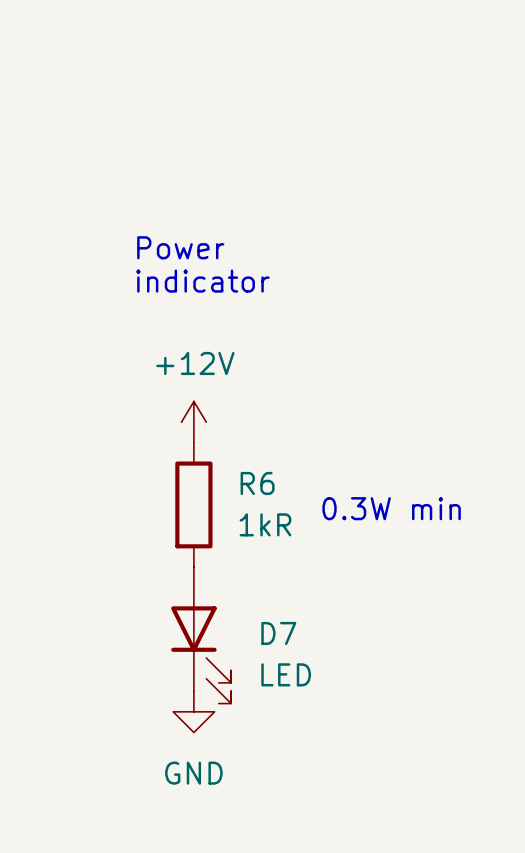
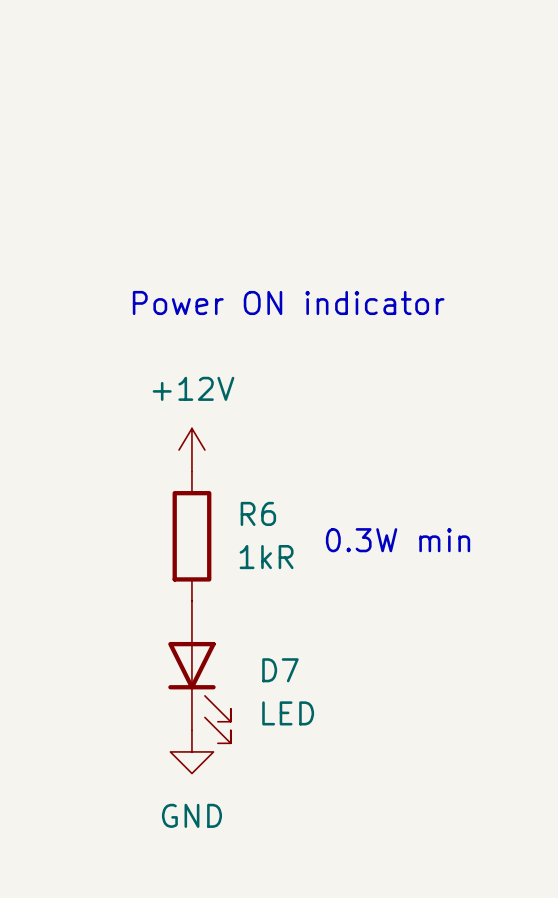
text: Power (180, 247) -> none
text: indicator (202, 281) -> Power ON indicator (288, 302)

